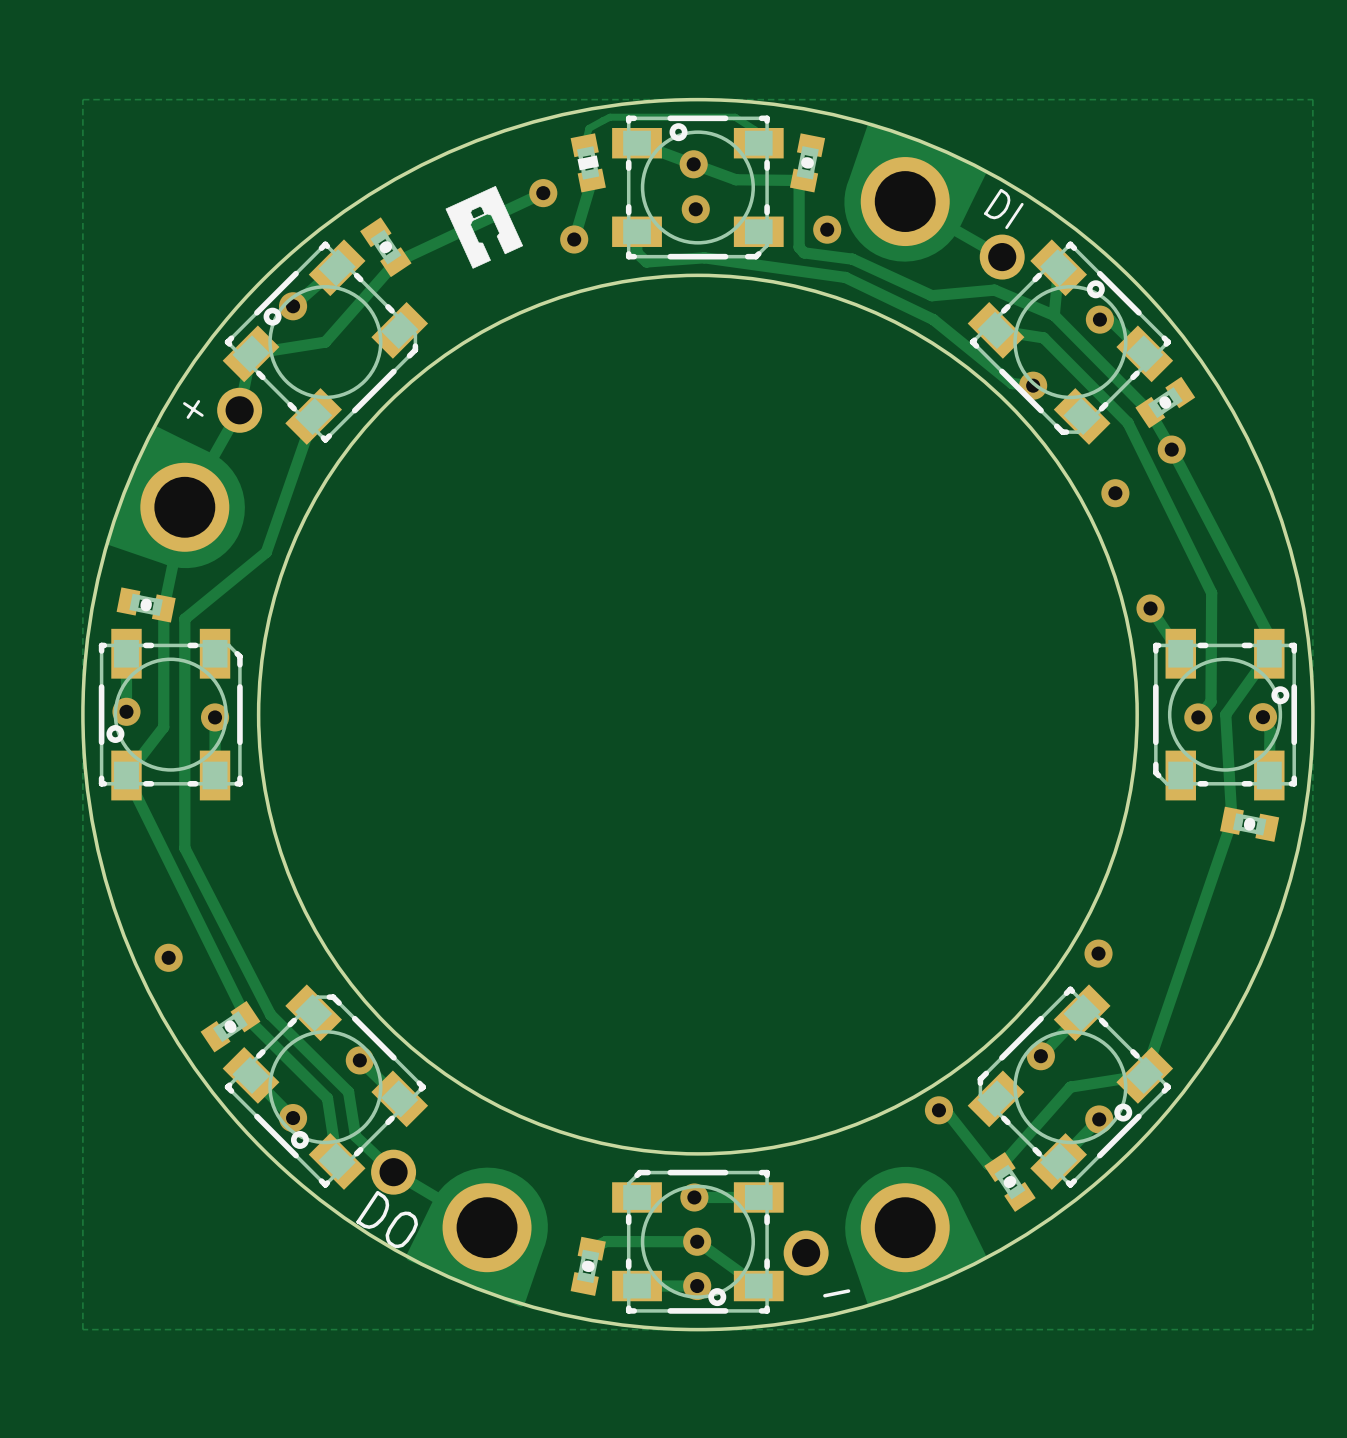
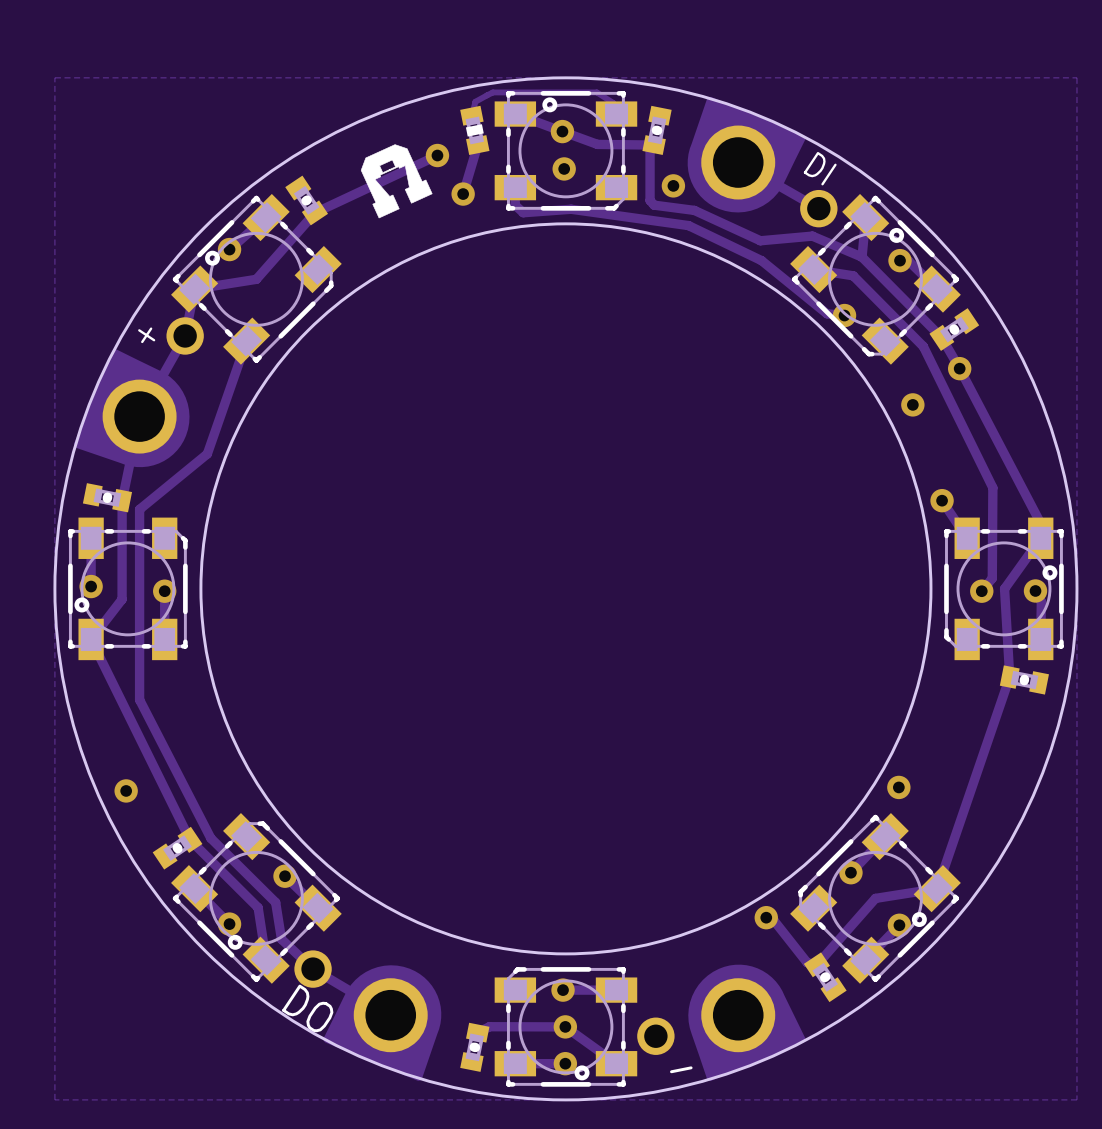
drawing shape: [445, 185, 524, 269] -> [360, 144, 433, 219]

